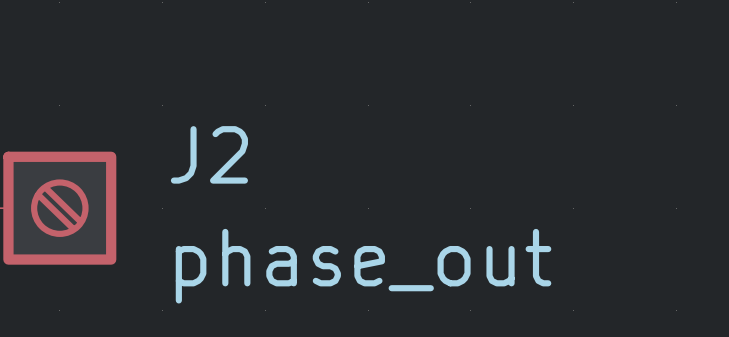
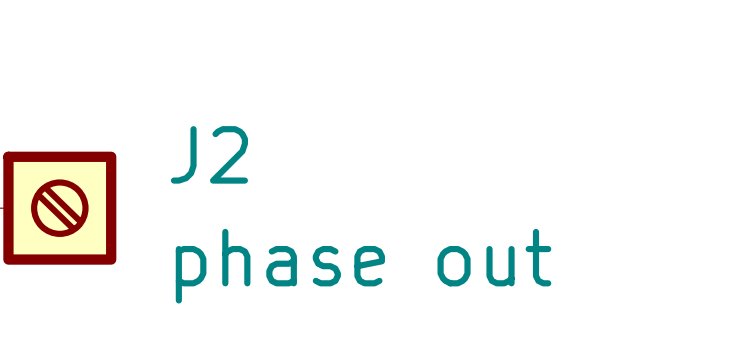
J2 value: phase_out (363, 266) -> phase out (363, 266)

